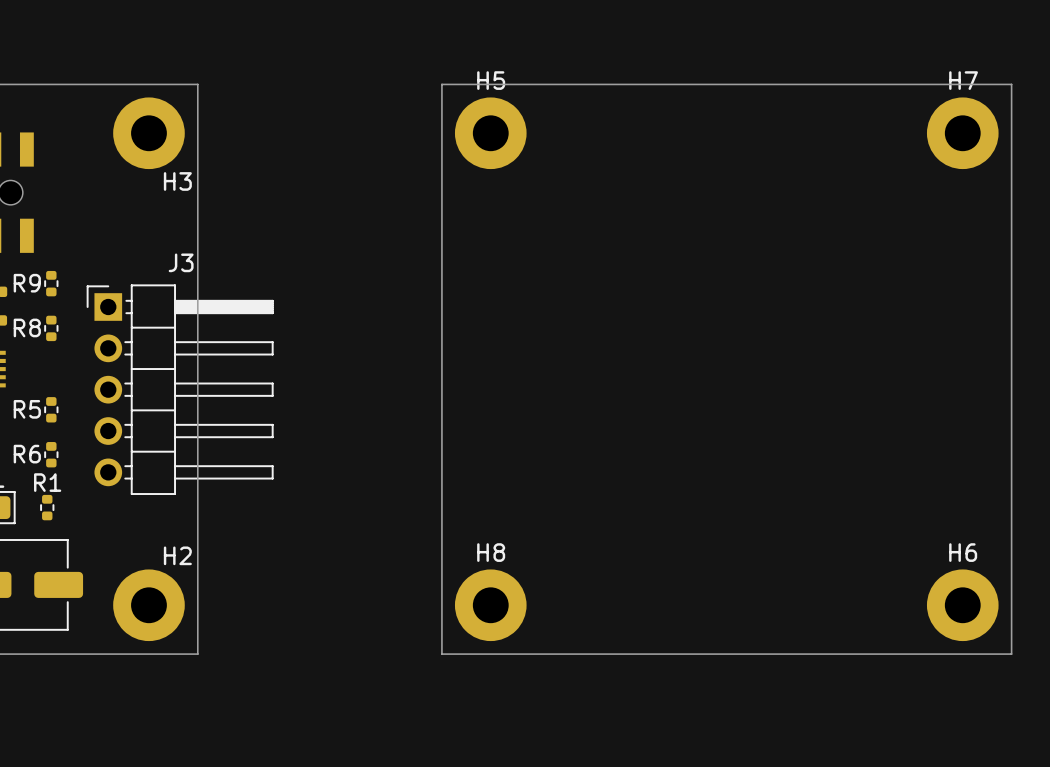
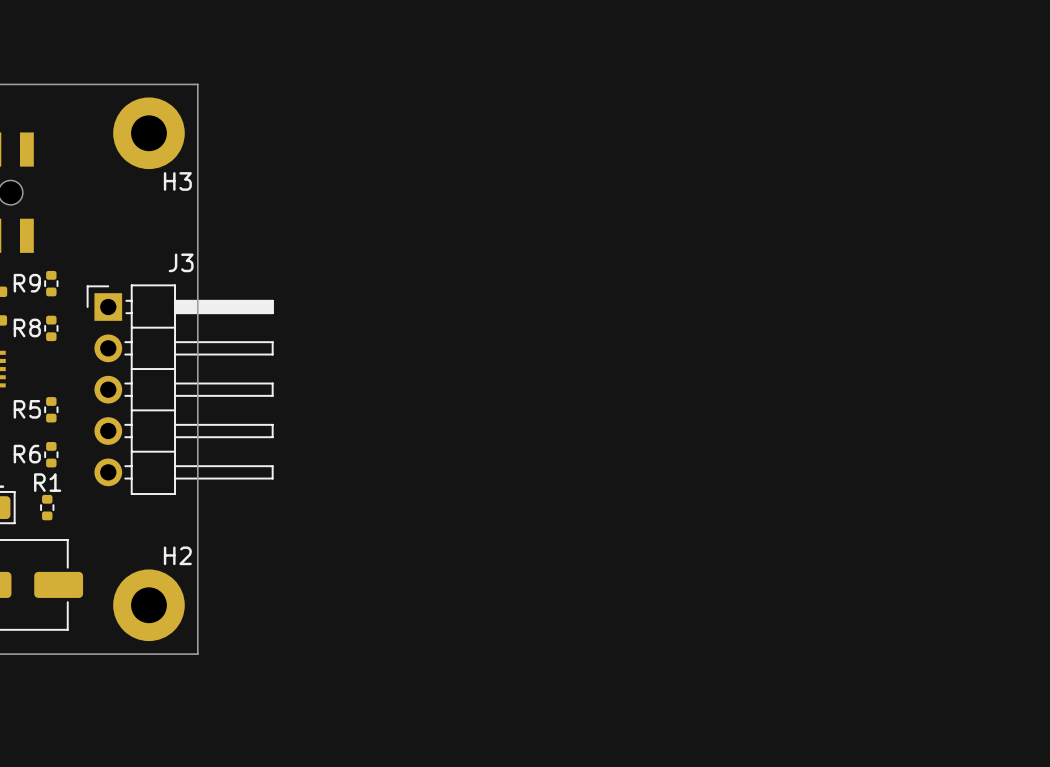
board edge: (441, 84) (1011, 84) (1011, 654) (441, 654) (441, 84) -> none
H5: (490, 133) -> none
H7: (962, 133) -> none
H8: (490, 605) -> none
H6: (962, 605) -> none

